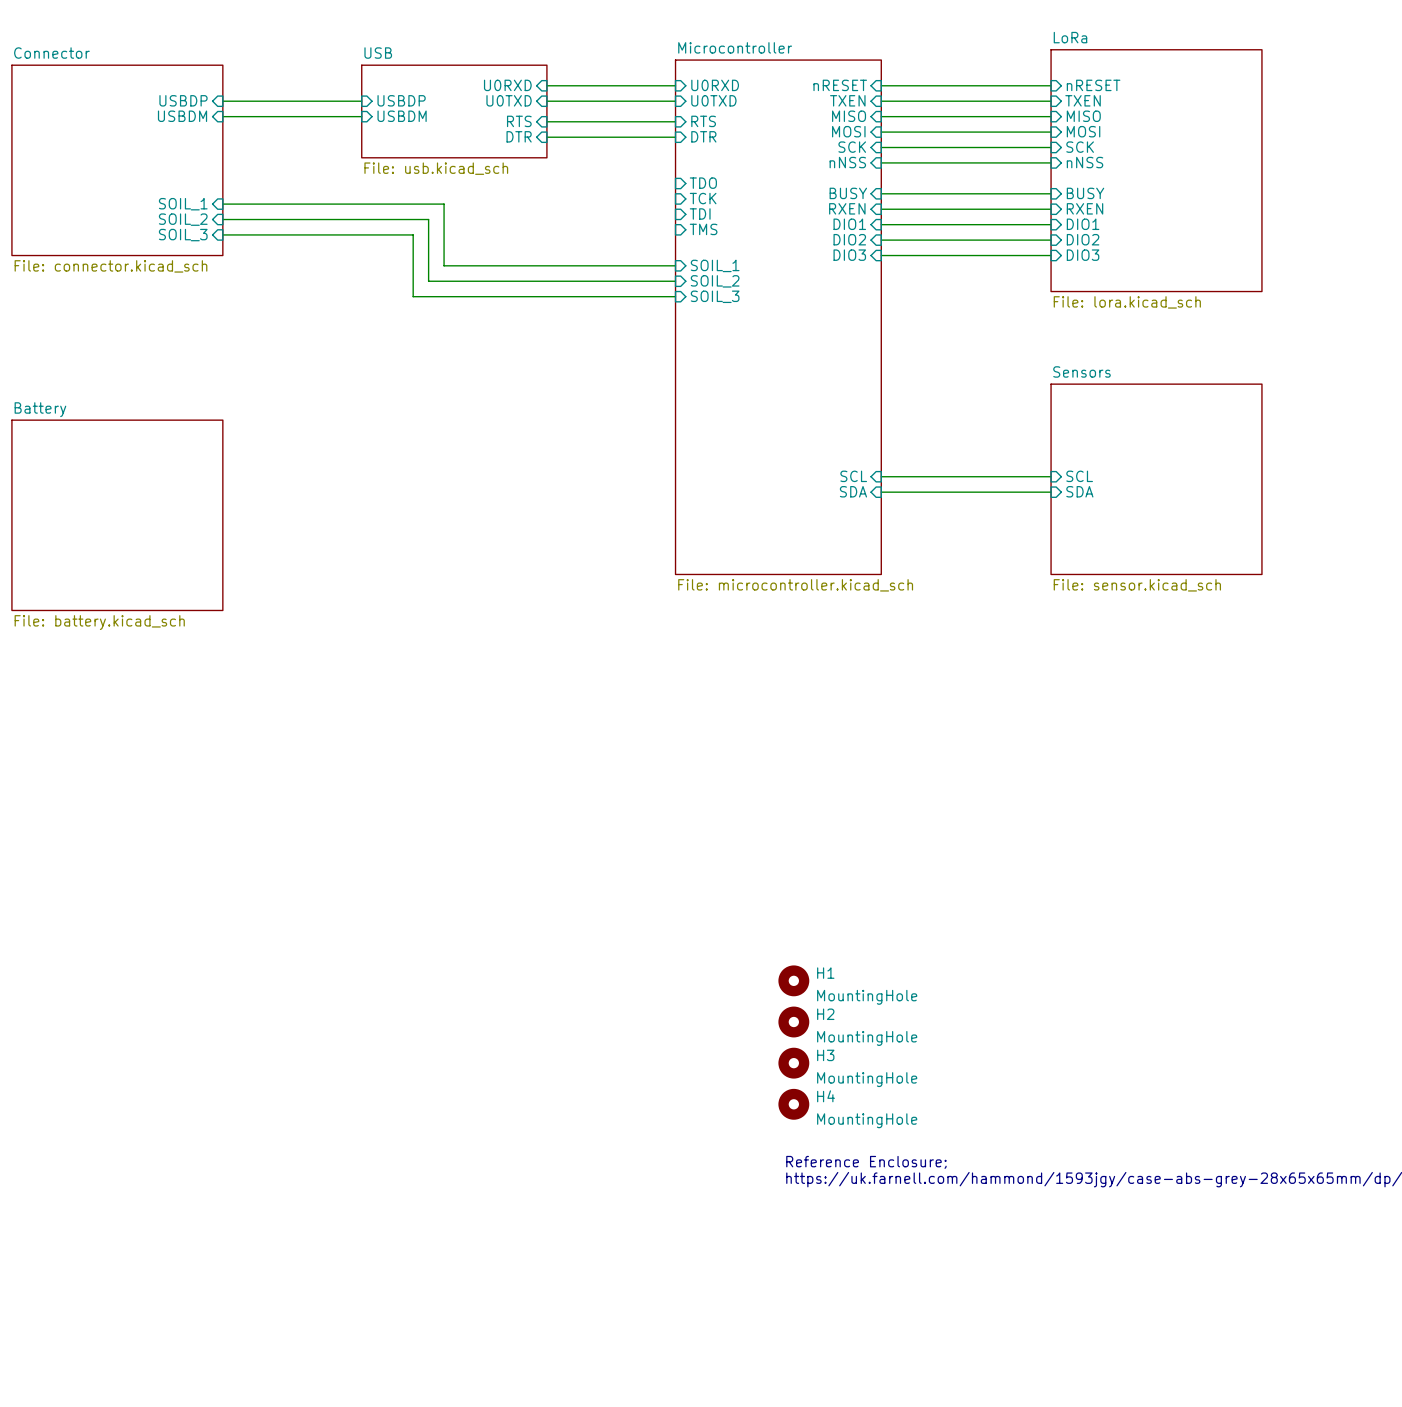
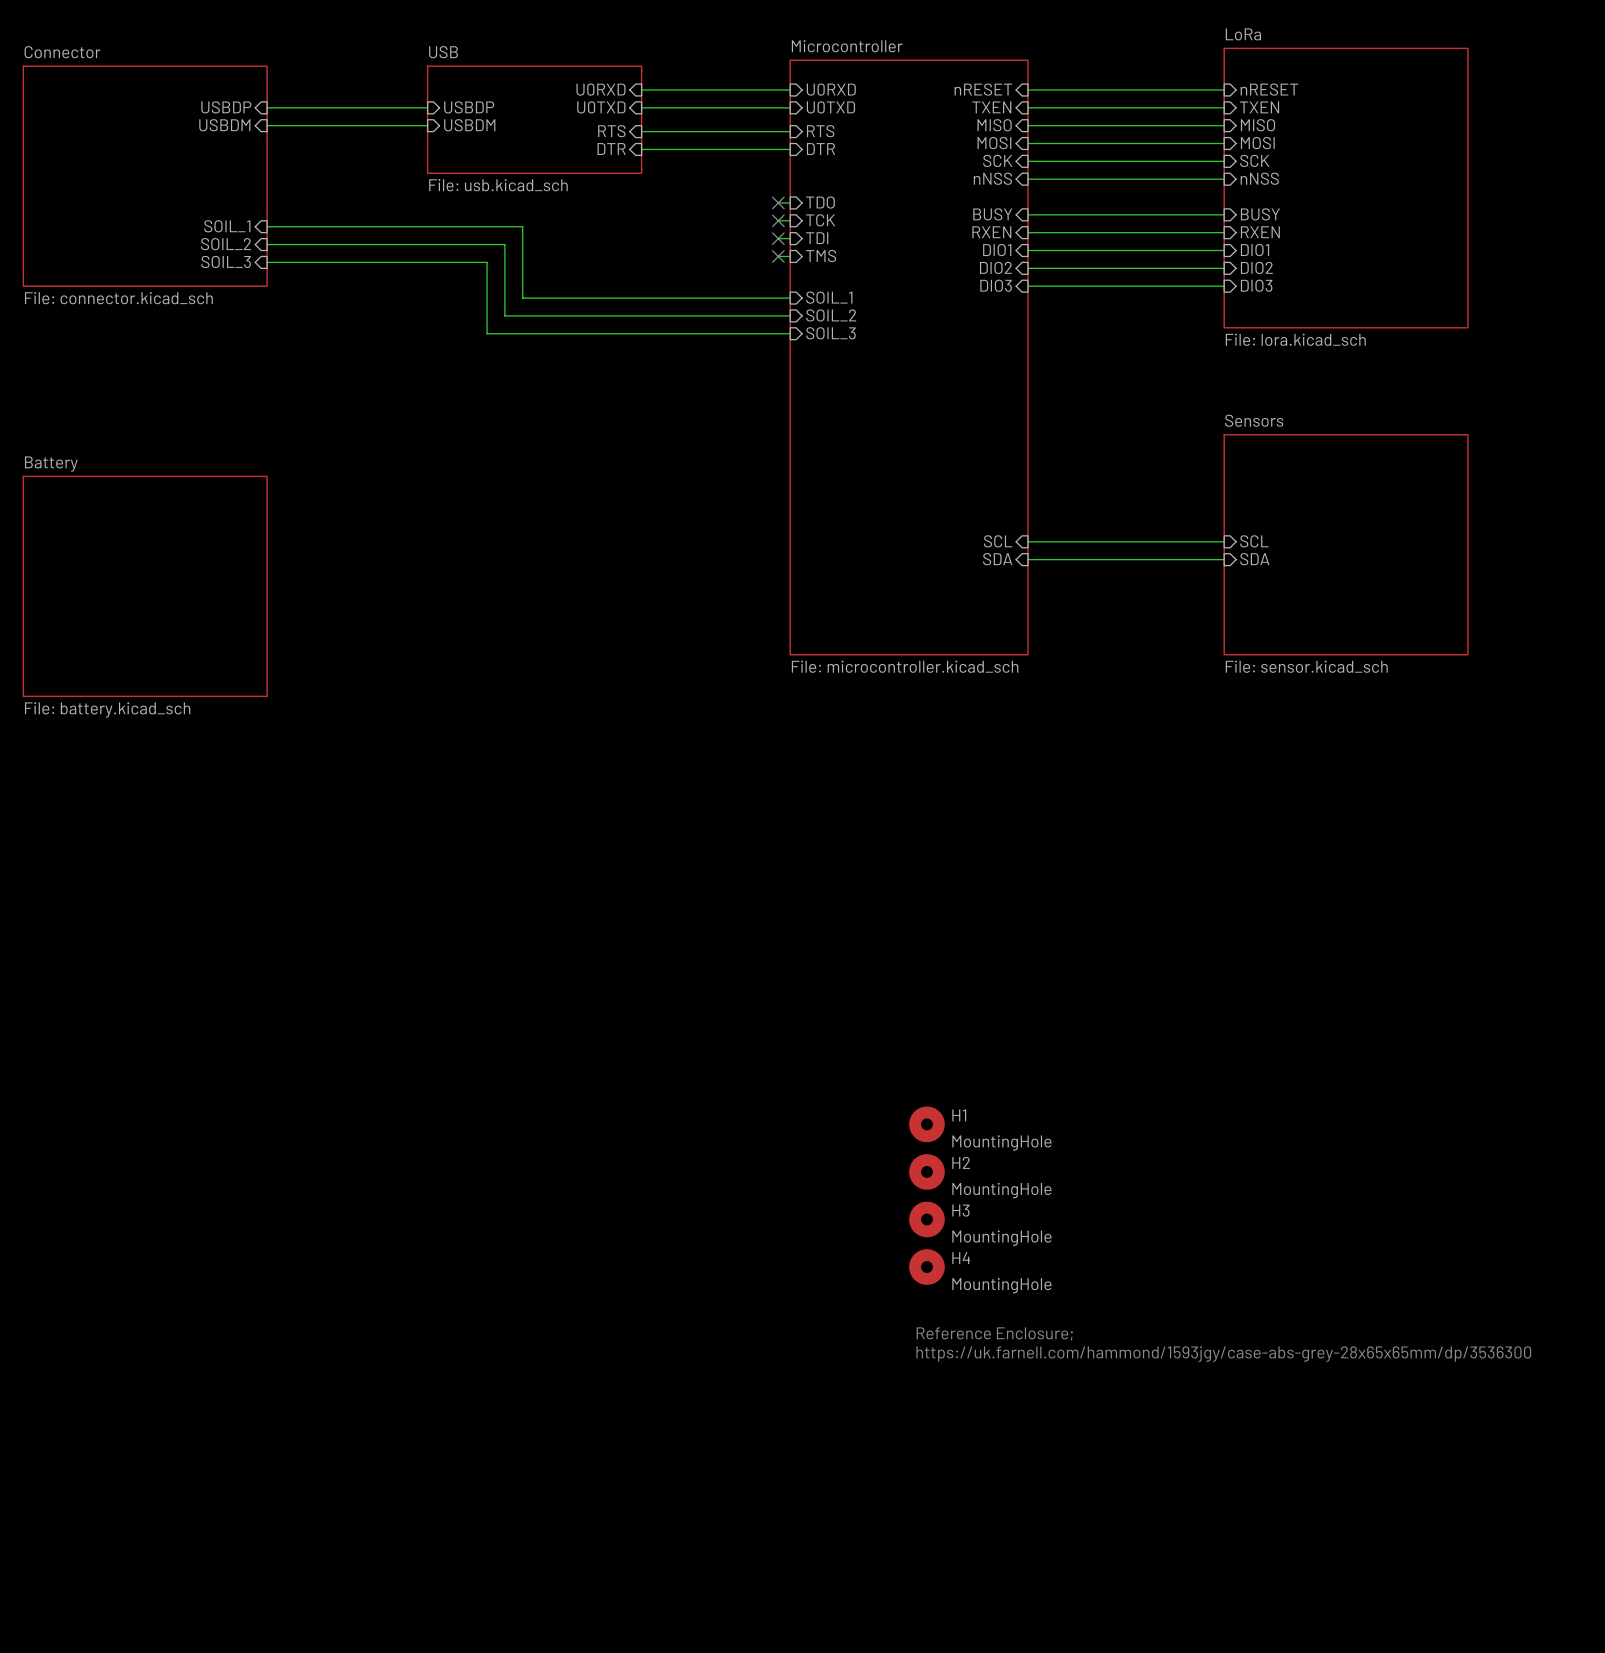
wire: none -> (778, 202) (790, 202)
no-connect mark: none -> (778, 202)
wire: none -> (778, 220) (790, 220)
no-connect mark: none -> (778, 220)
wire: none -> (778, 238) (790, 238)
no-connect mark: none -> (778, 238)
wire: none -> (778, 256) (790, 256)
no-connect mark: none -> (778, 256)

